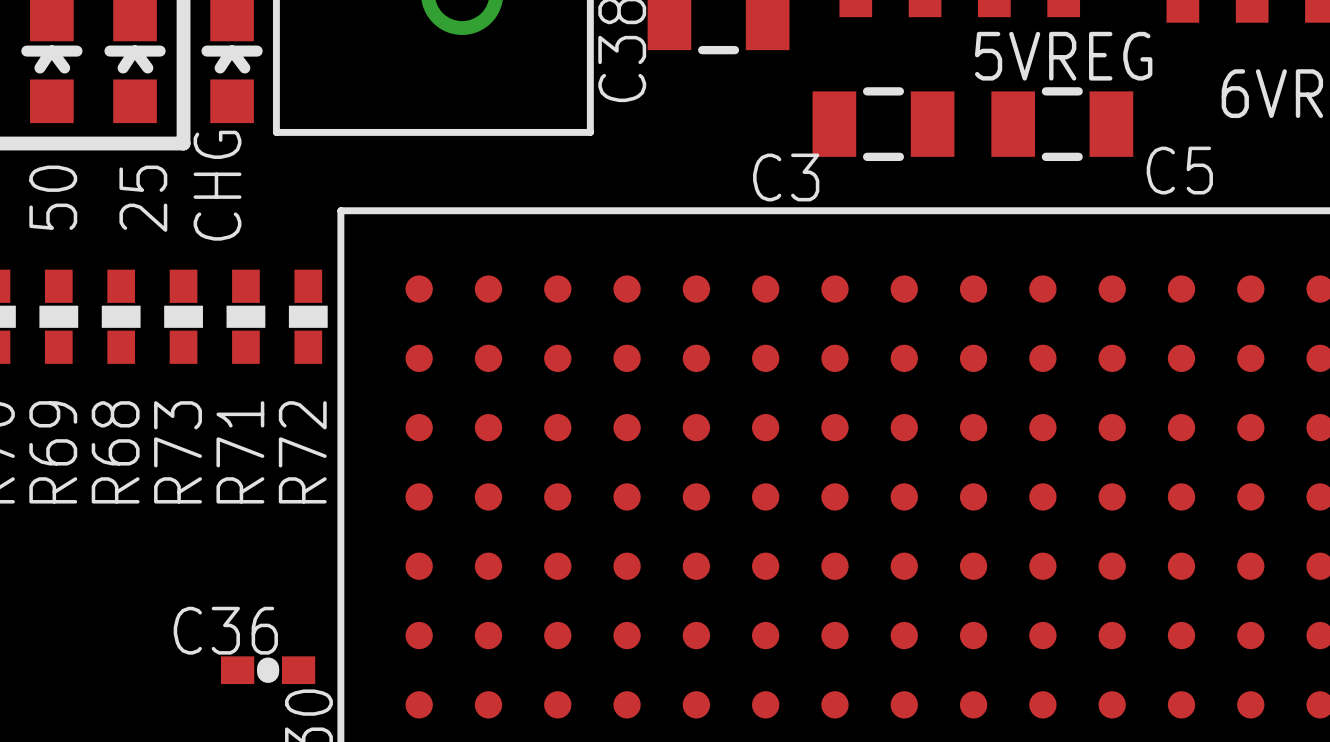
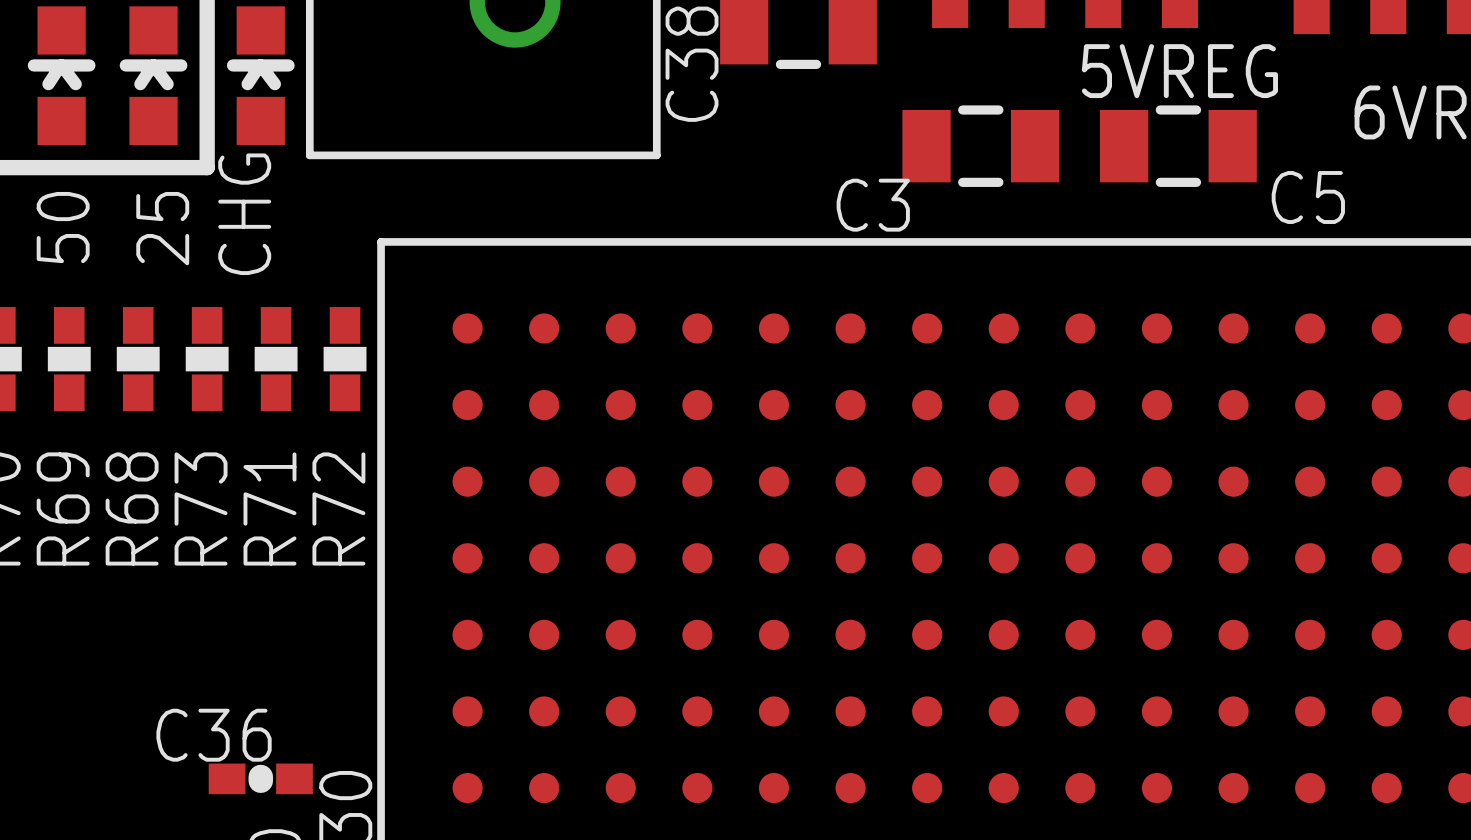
C36 position: (268, 670) -> (260, 778)

